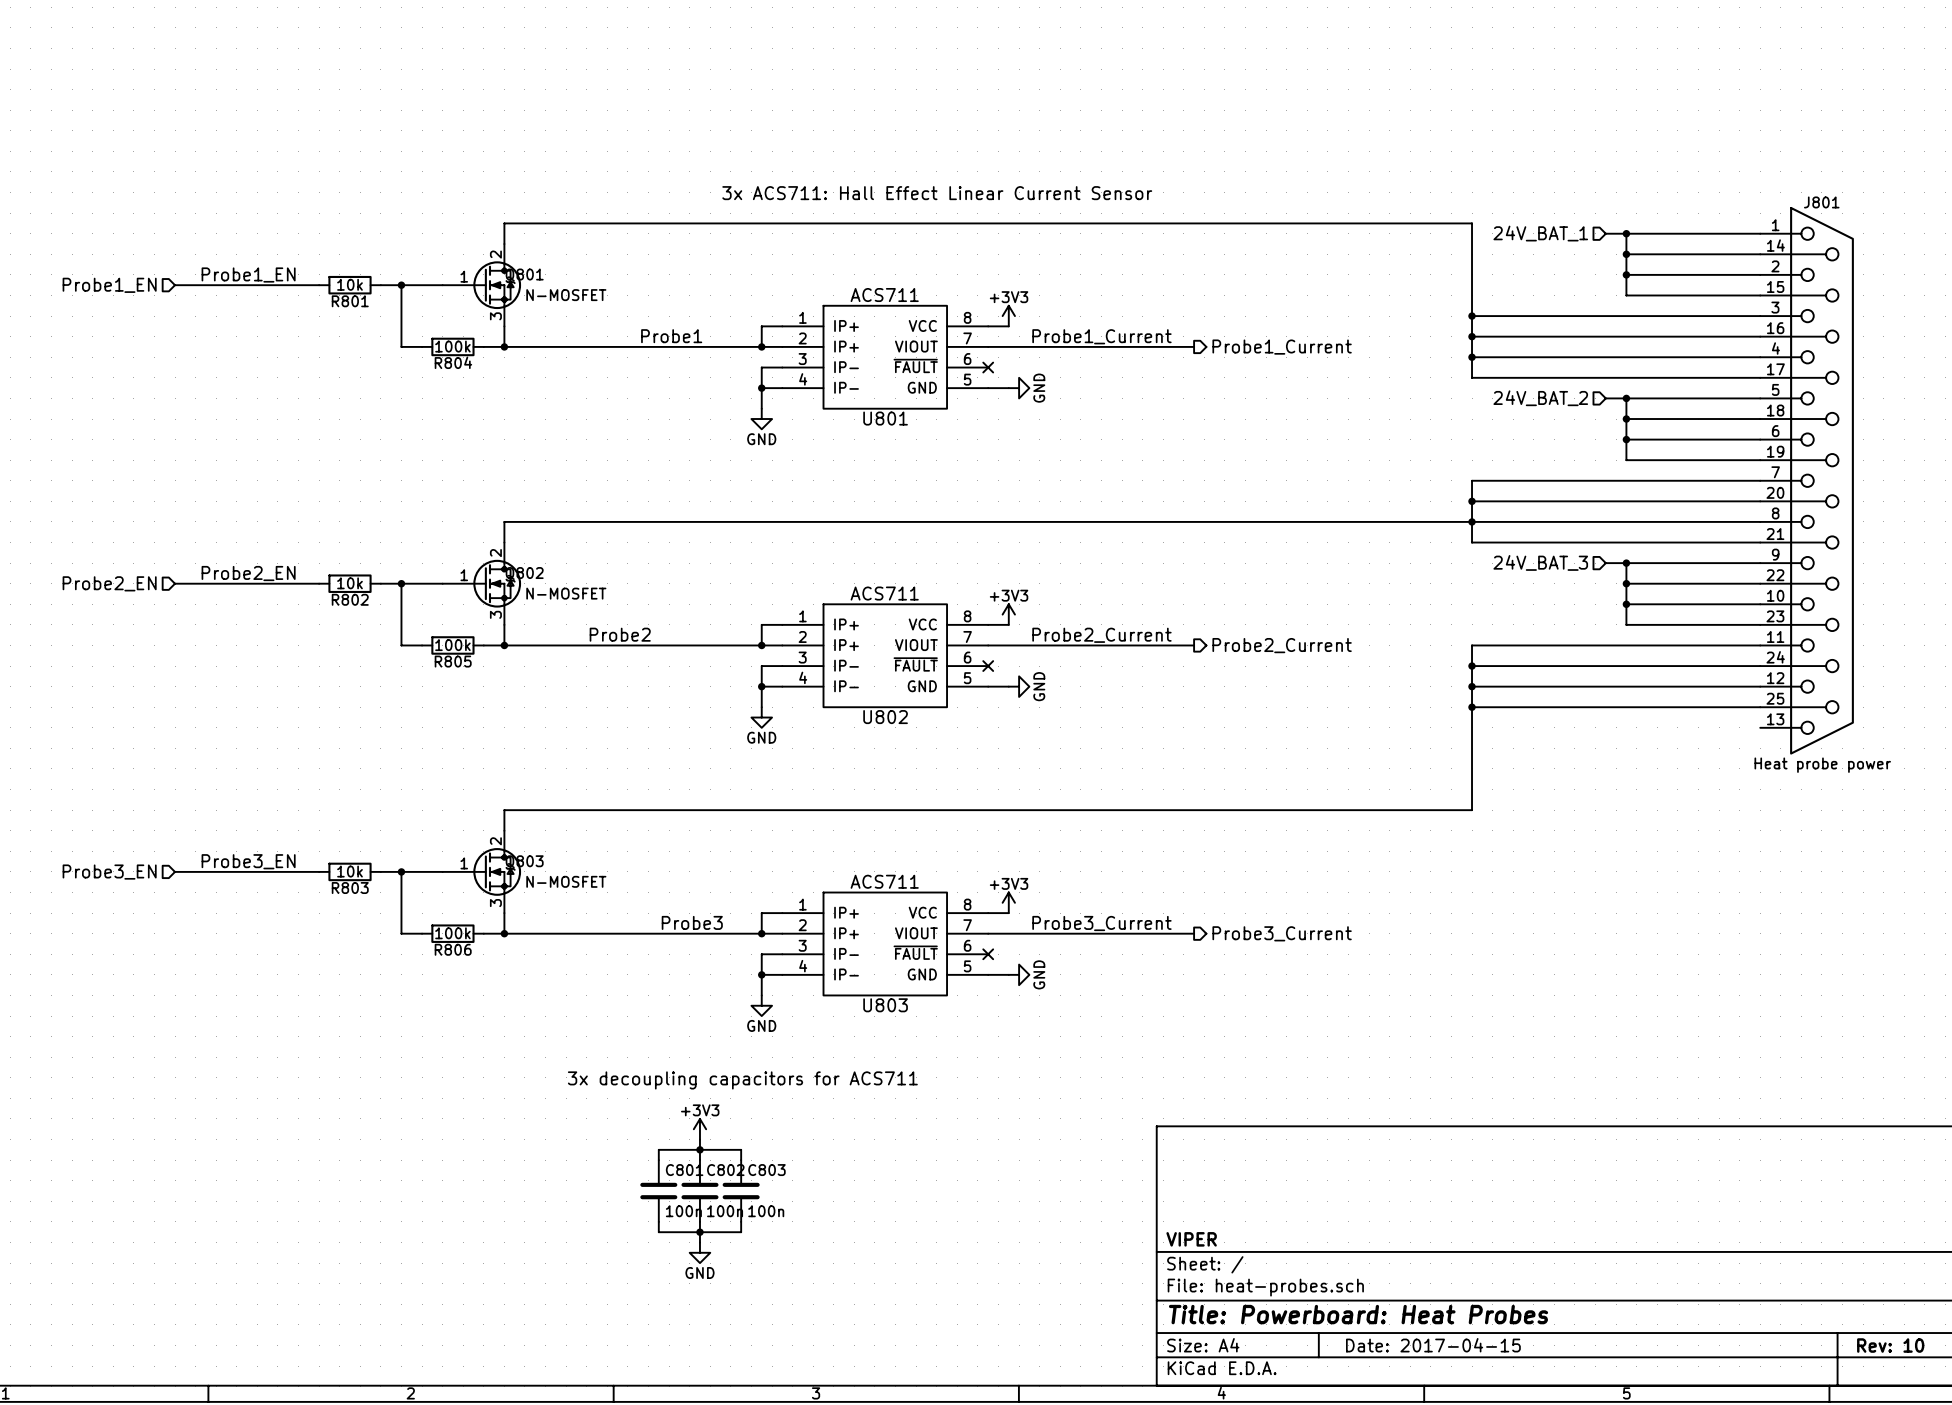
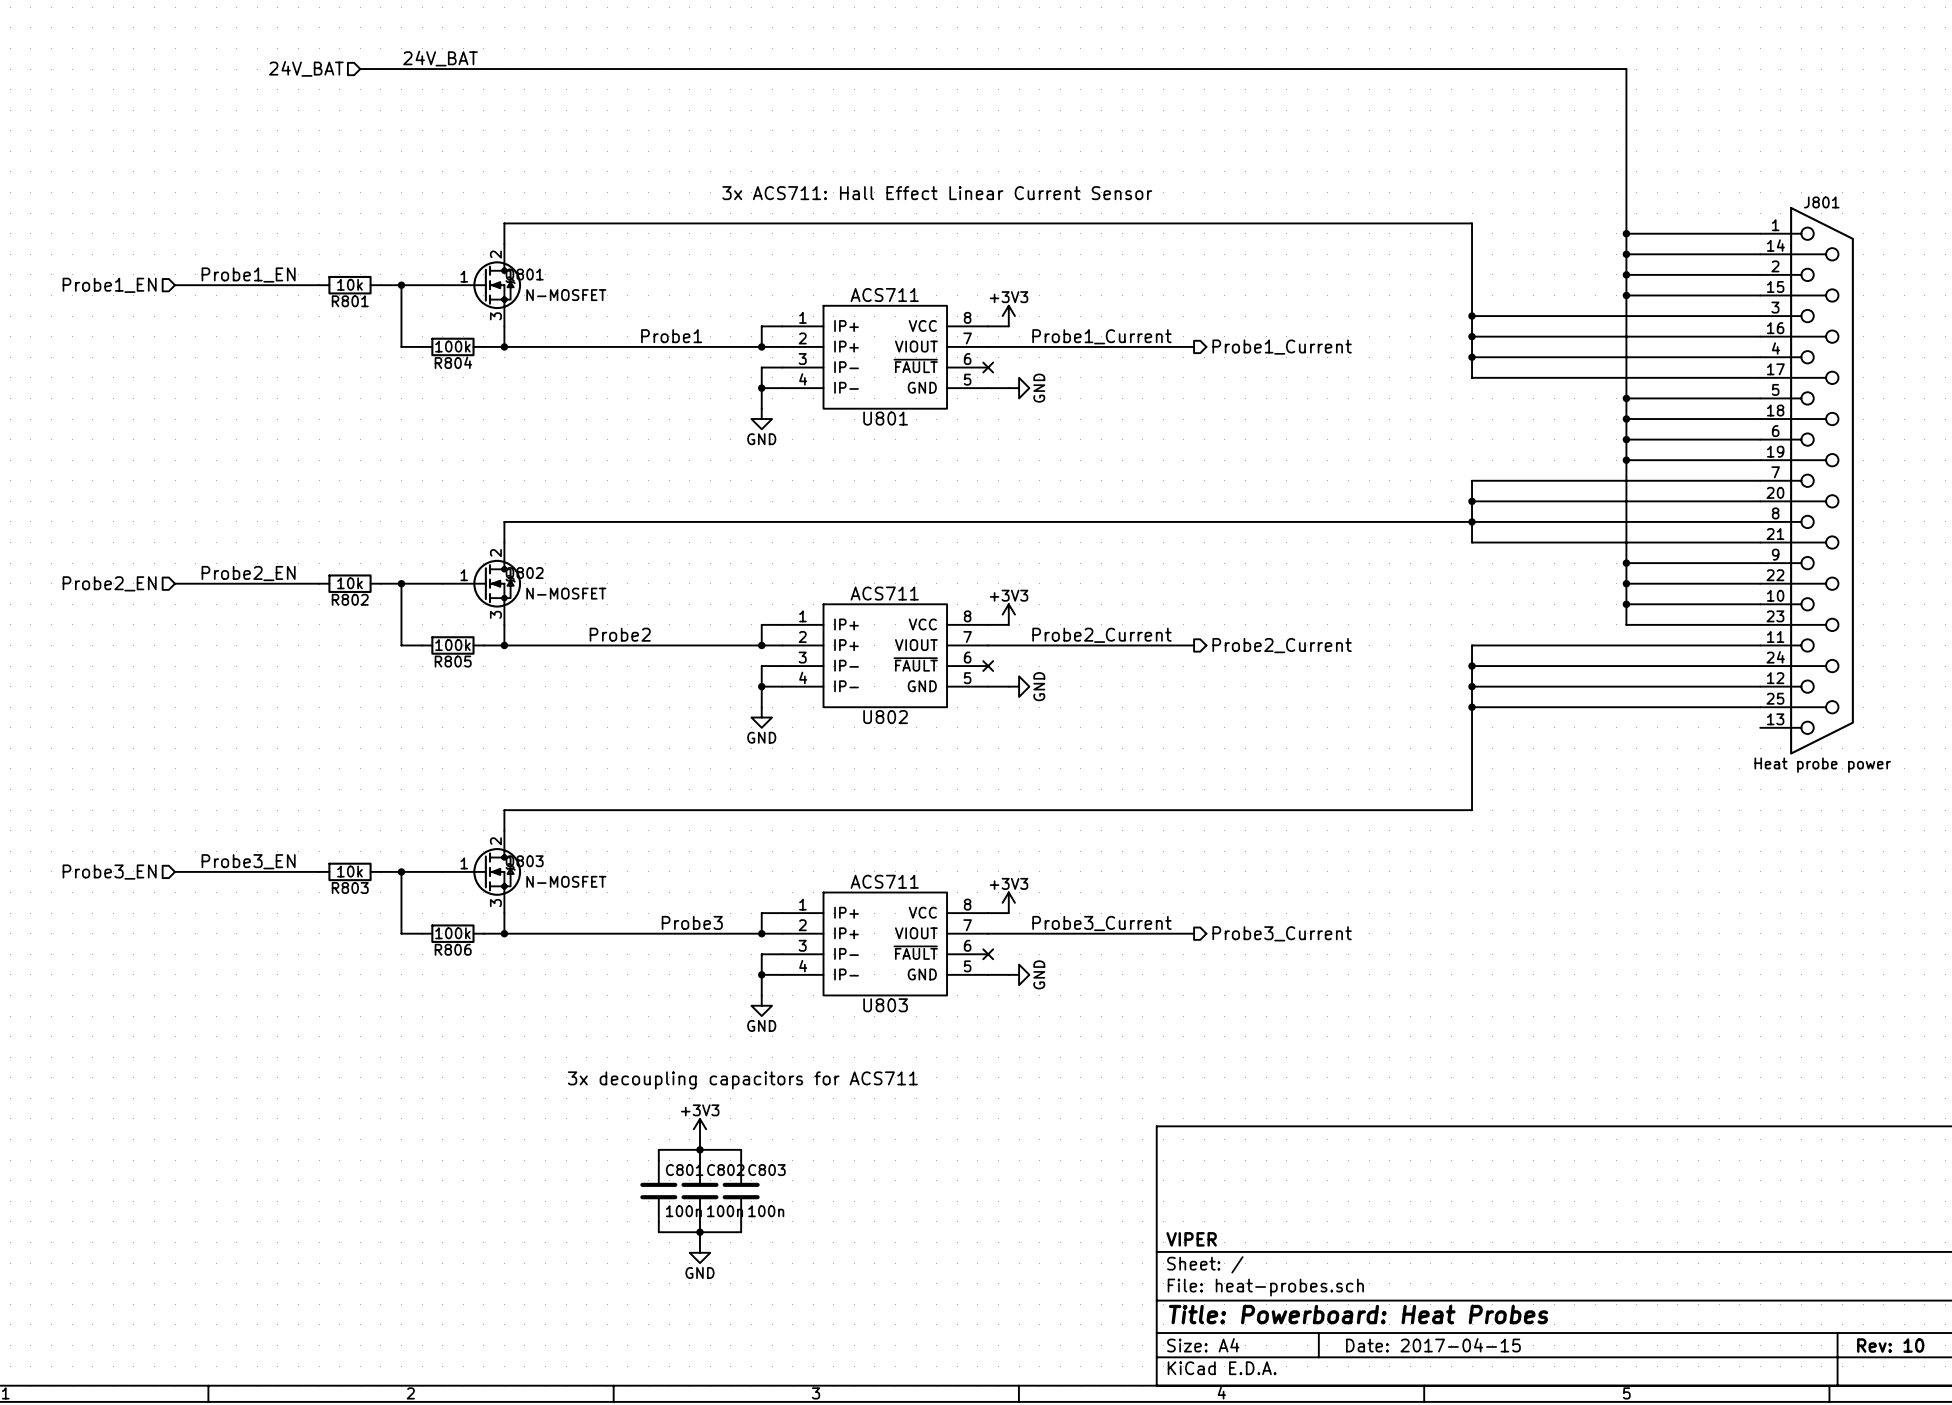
label: none -> 24V_BAT (440, 58)
hierarchical label: none -> 24V_BAT (306, 68)
hierarchical label: 24V_BAT_1 (1540, 233) -> none
wire: (1605, 233) (1626, 233) -> (360, 69) (1626, 69) (1626, 233)
junction: none -> (1626, 295)
hierarchical label: 24V_BAT_2 (1540, 398) -> none
wire: (1605, 398) (1626, 398) -> (1626, 295) (1626, 398)
junction: none -> (1626, 460)
hierarchical label: 24V_BAT_3 (1540, 562) -> none
wire: (1605, 563) (1626, 563) -> (1626, 460) (1626, 563)

